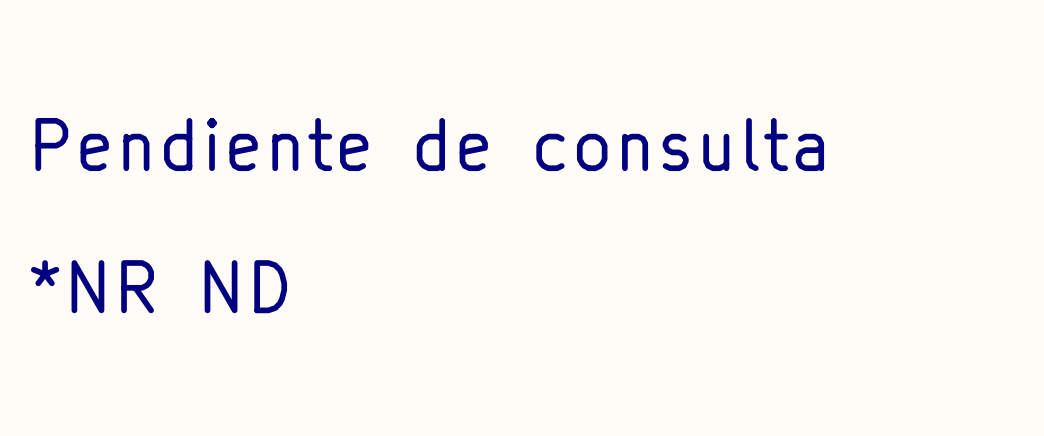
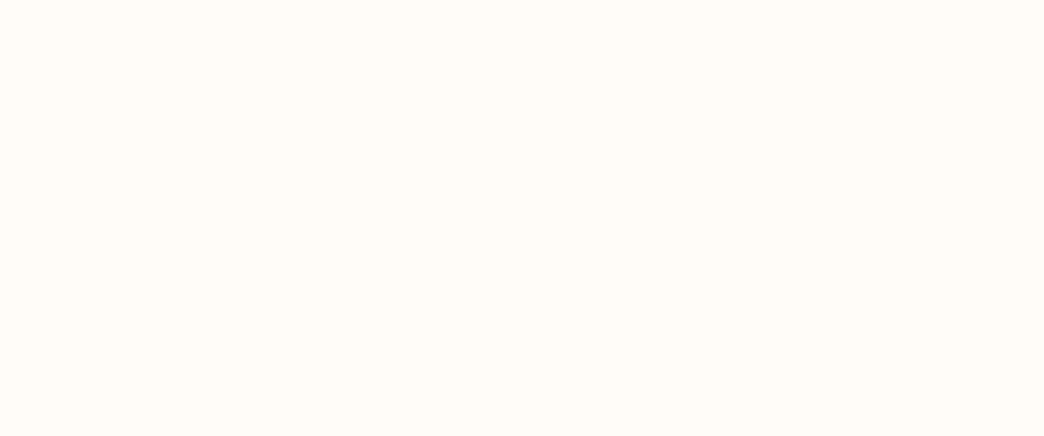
text: Pendiente de consulta (429, 144) -> none
text: *NR ND (159, 286) -> none

